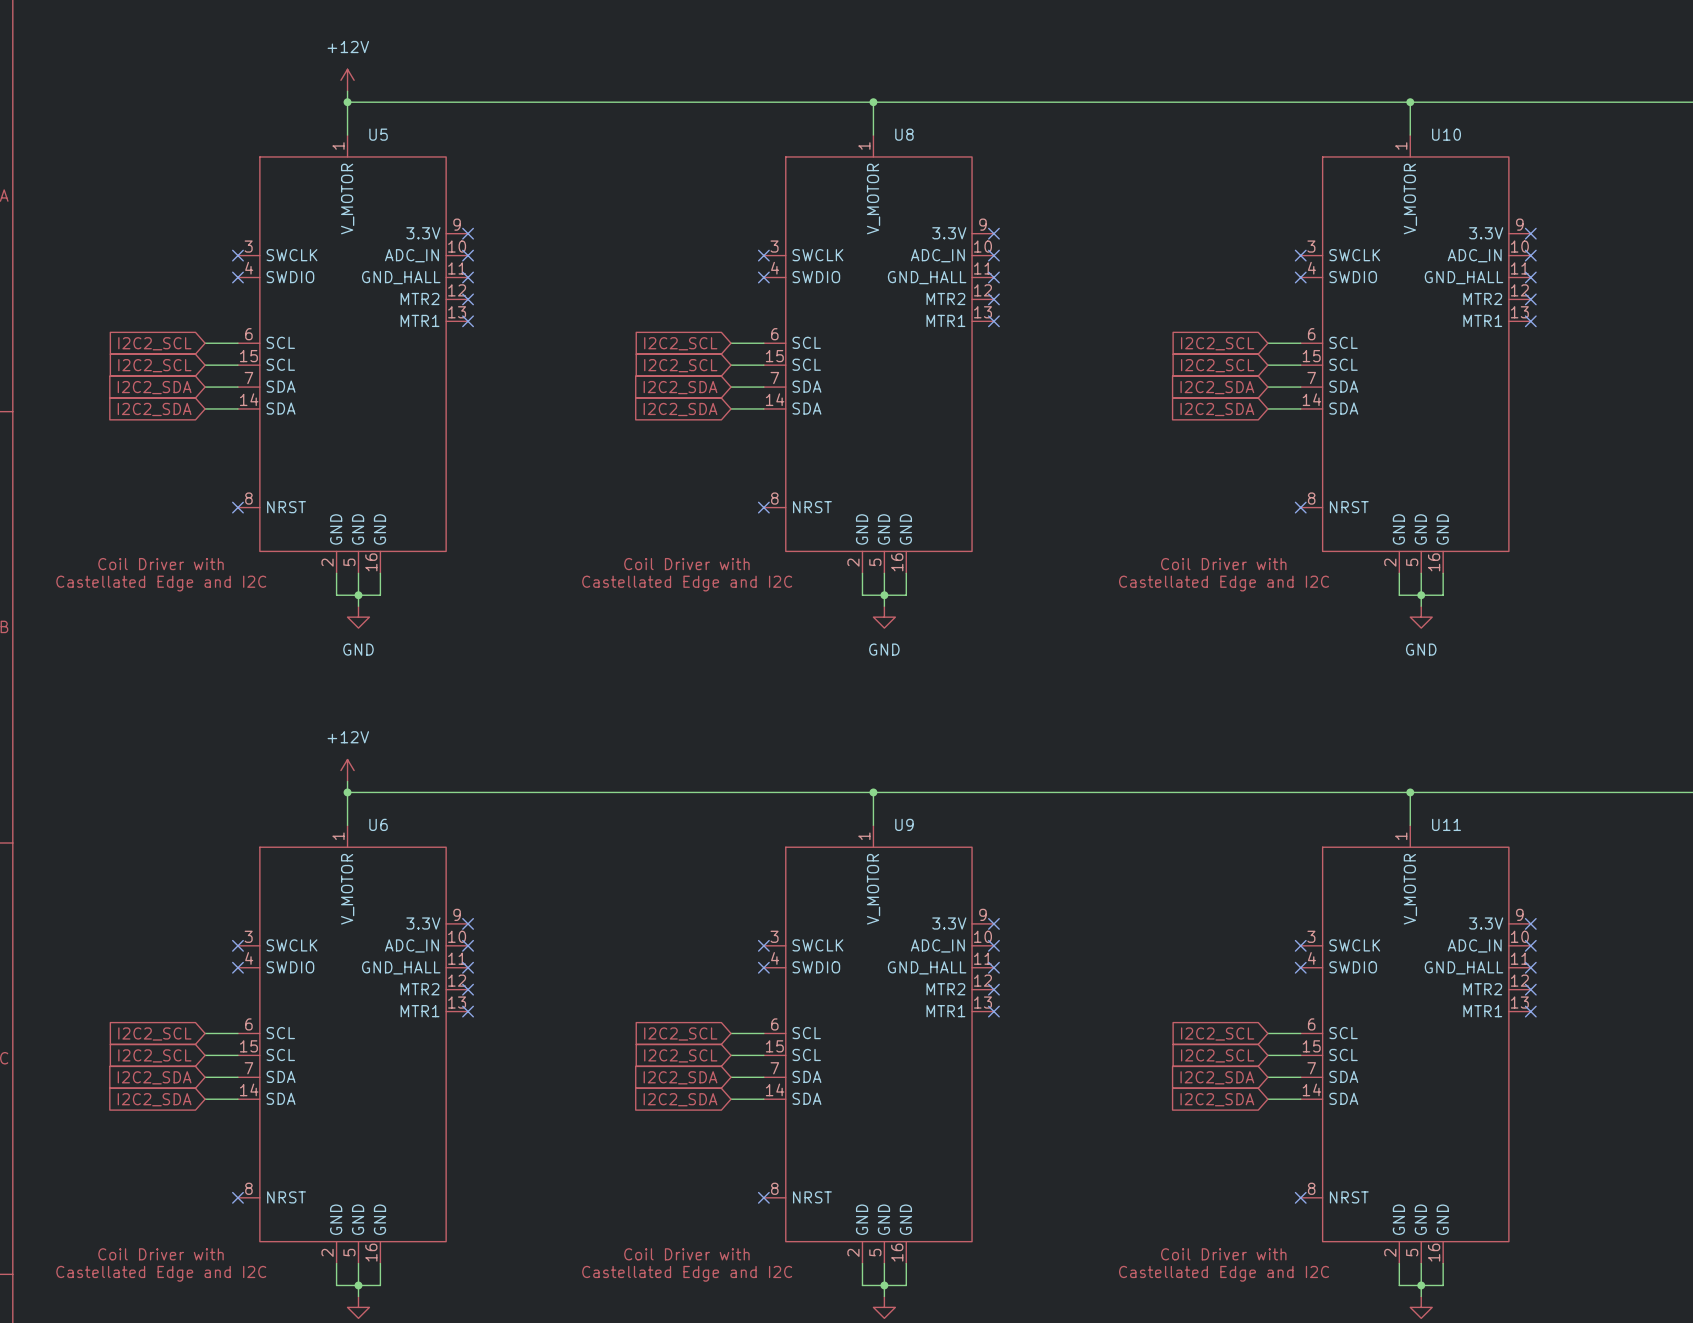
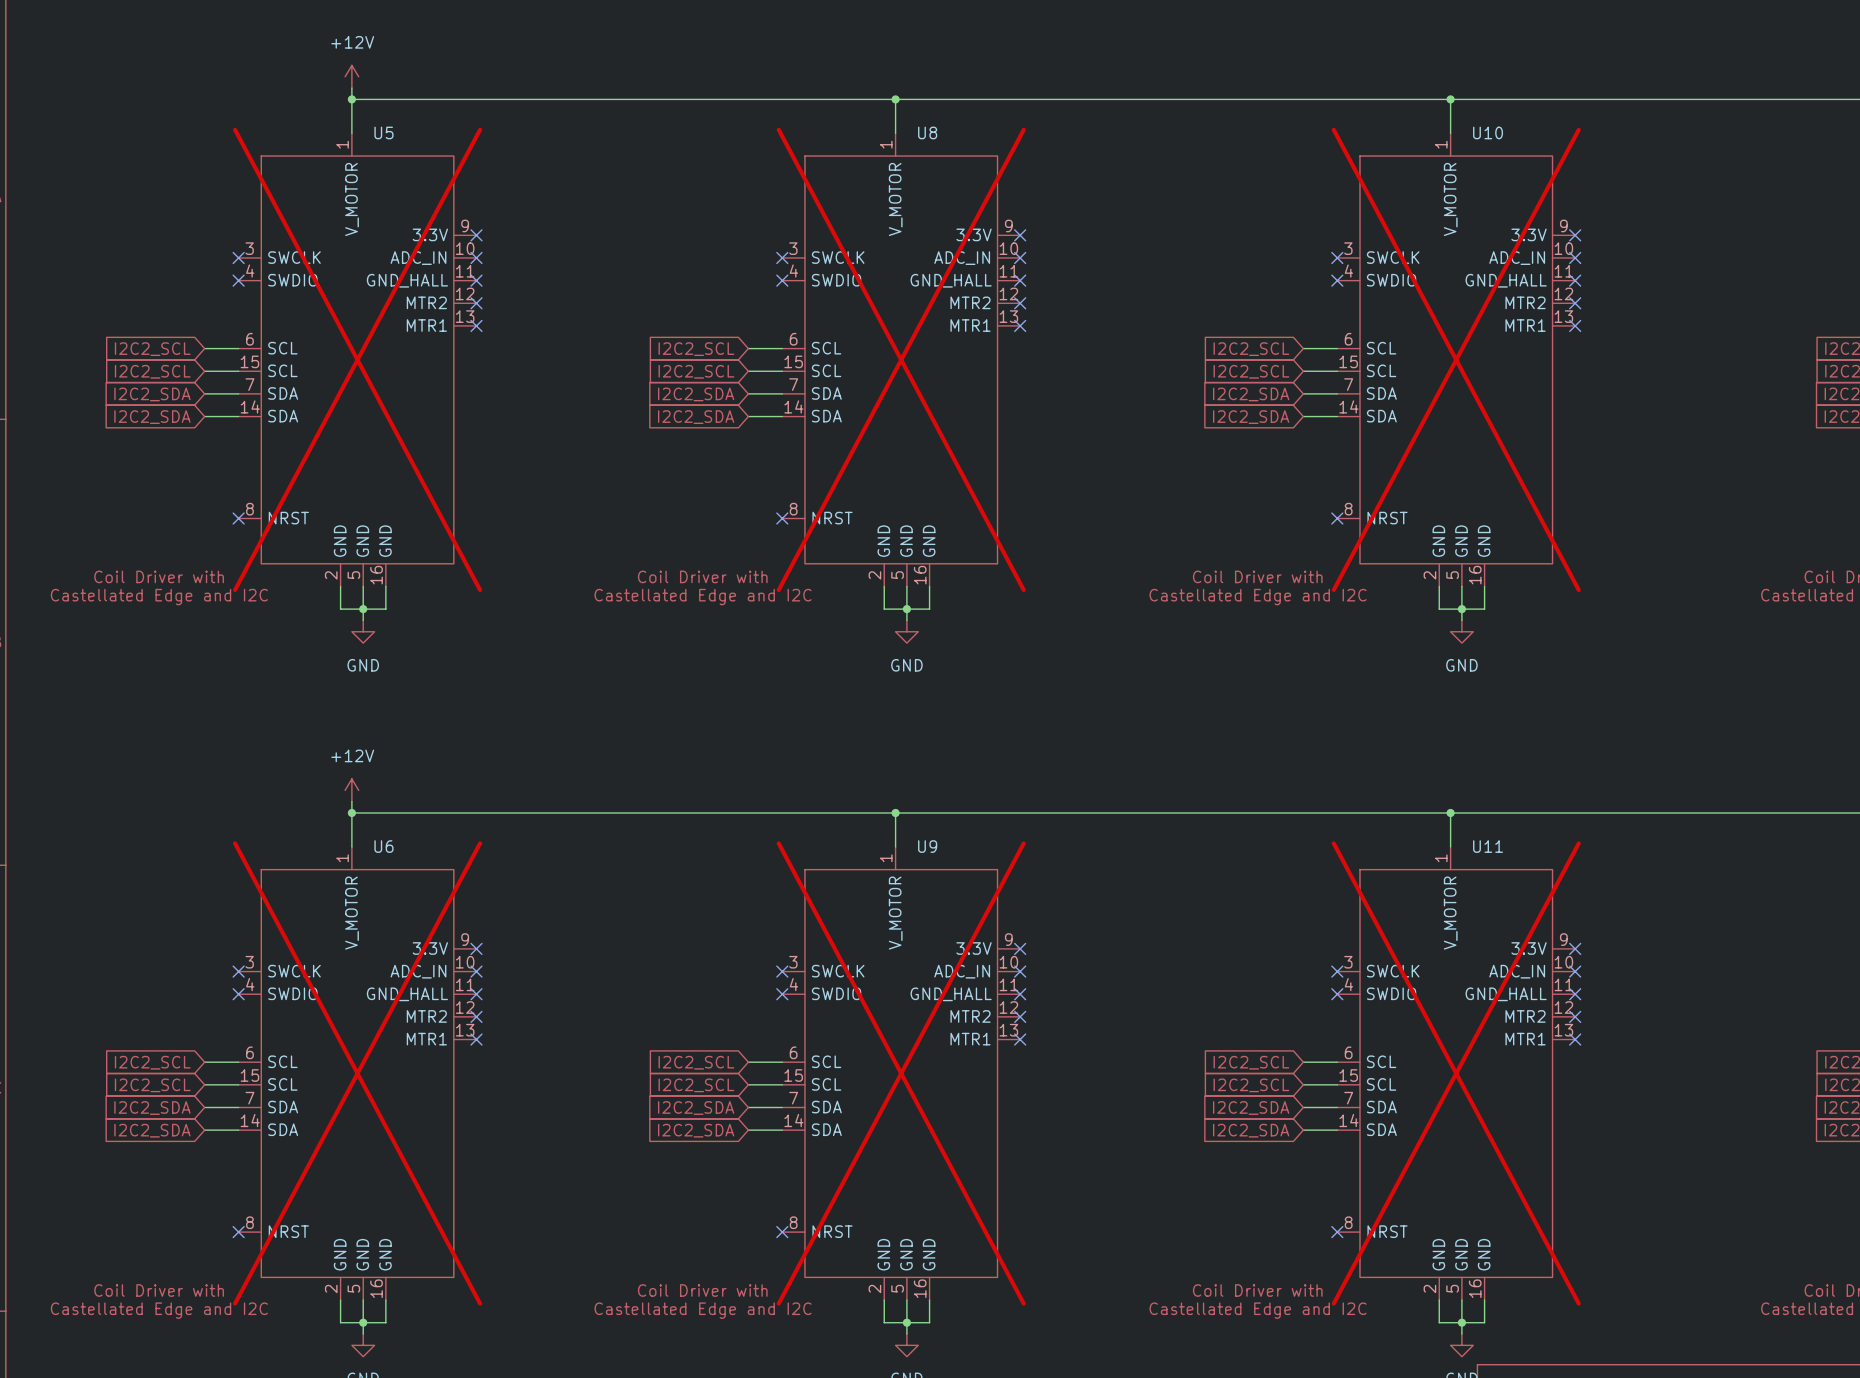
U5 do-not-place cross: none -> (357, 359)
U8 do-not-place cross: none -> (901, 359)
U10 do-not-place cross: none -> (1456, 359)
U6 do-not-place cross: none -> (357, 1073)
U9 do-not-place cross: none -> (901, 1073)
U11 do-not-place cross: none -> (1456, 1073)

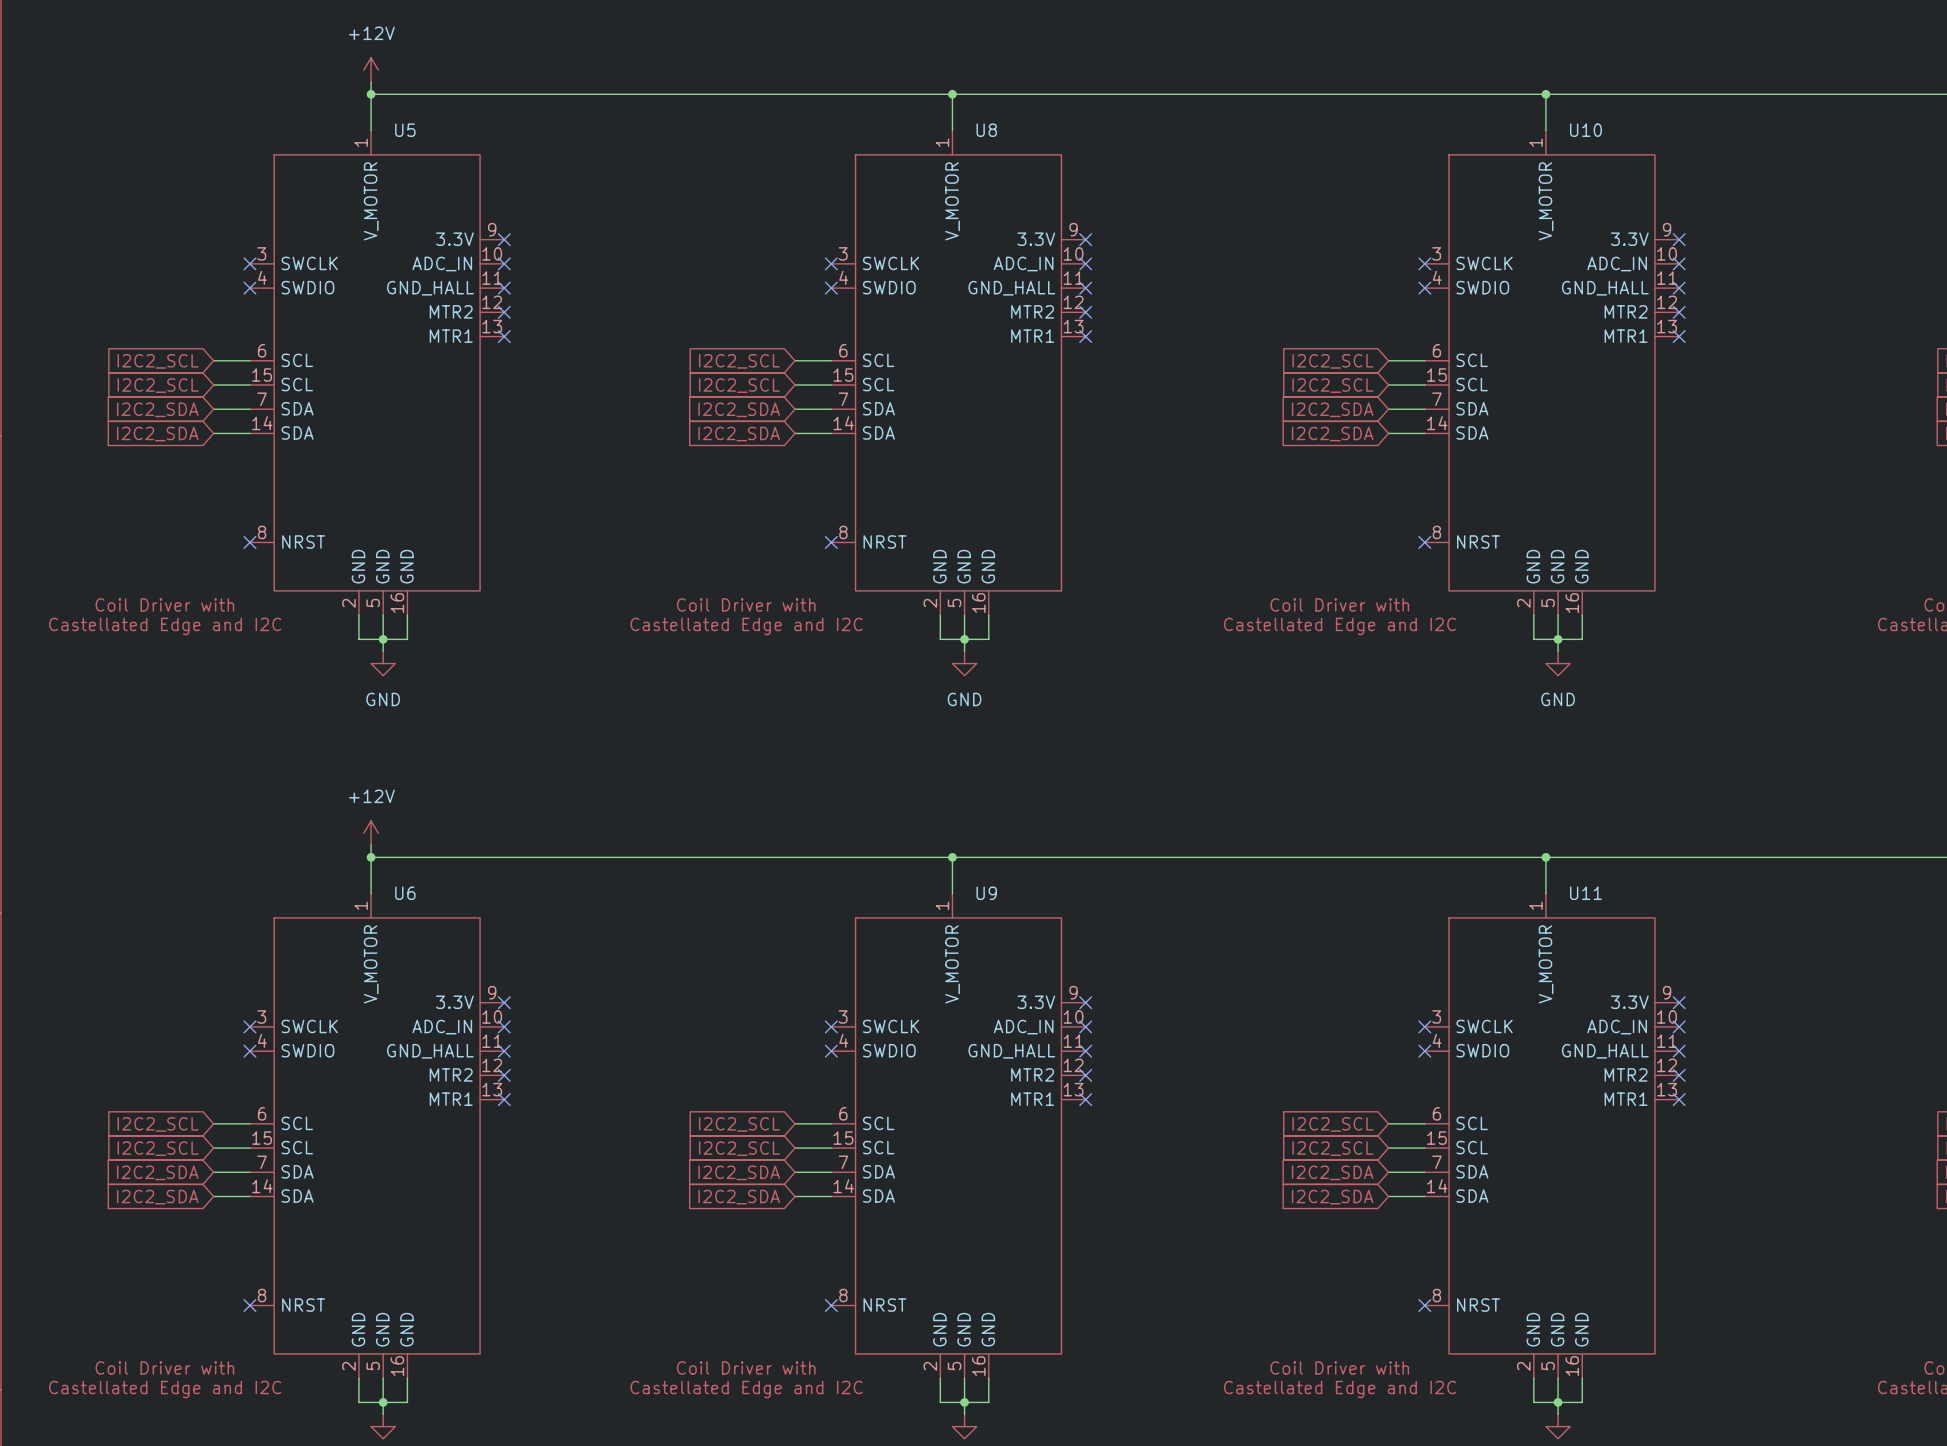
U5 do-not-place cross: (357, 359) -> none
U8 do-not-place cross: (901, 359) -> none
U10 do-not-place cross: (1456, 359) -> none
U6 do-not-place cross: (357, 1073) -> none
U9 do-not-place cross: (901, 1073) -> none
U11 do-not-place cross: (1456, 1073) -> none

